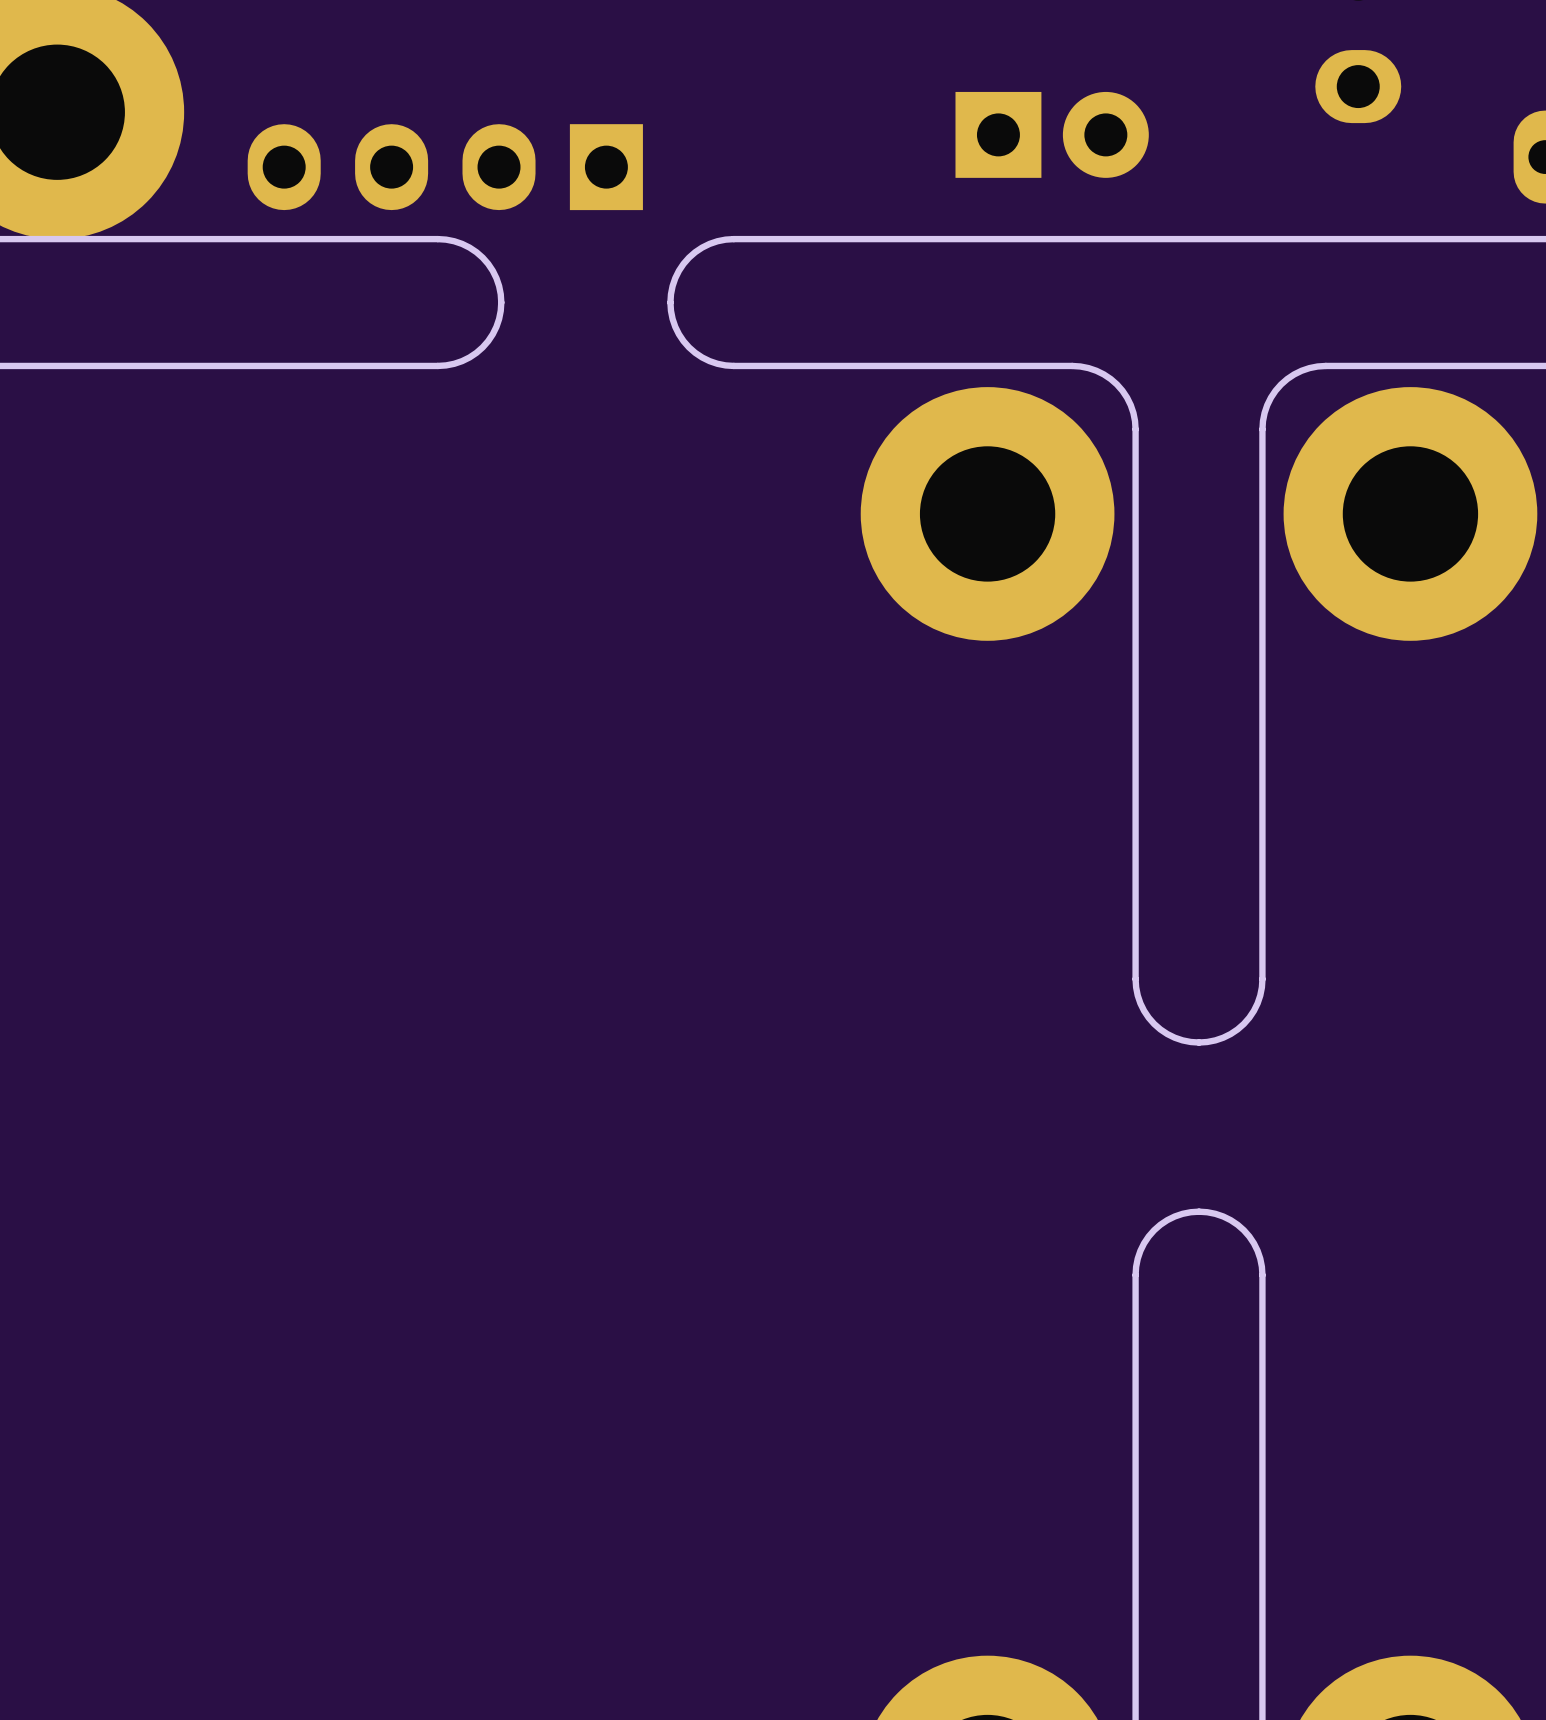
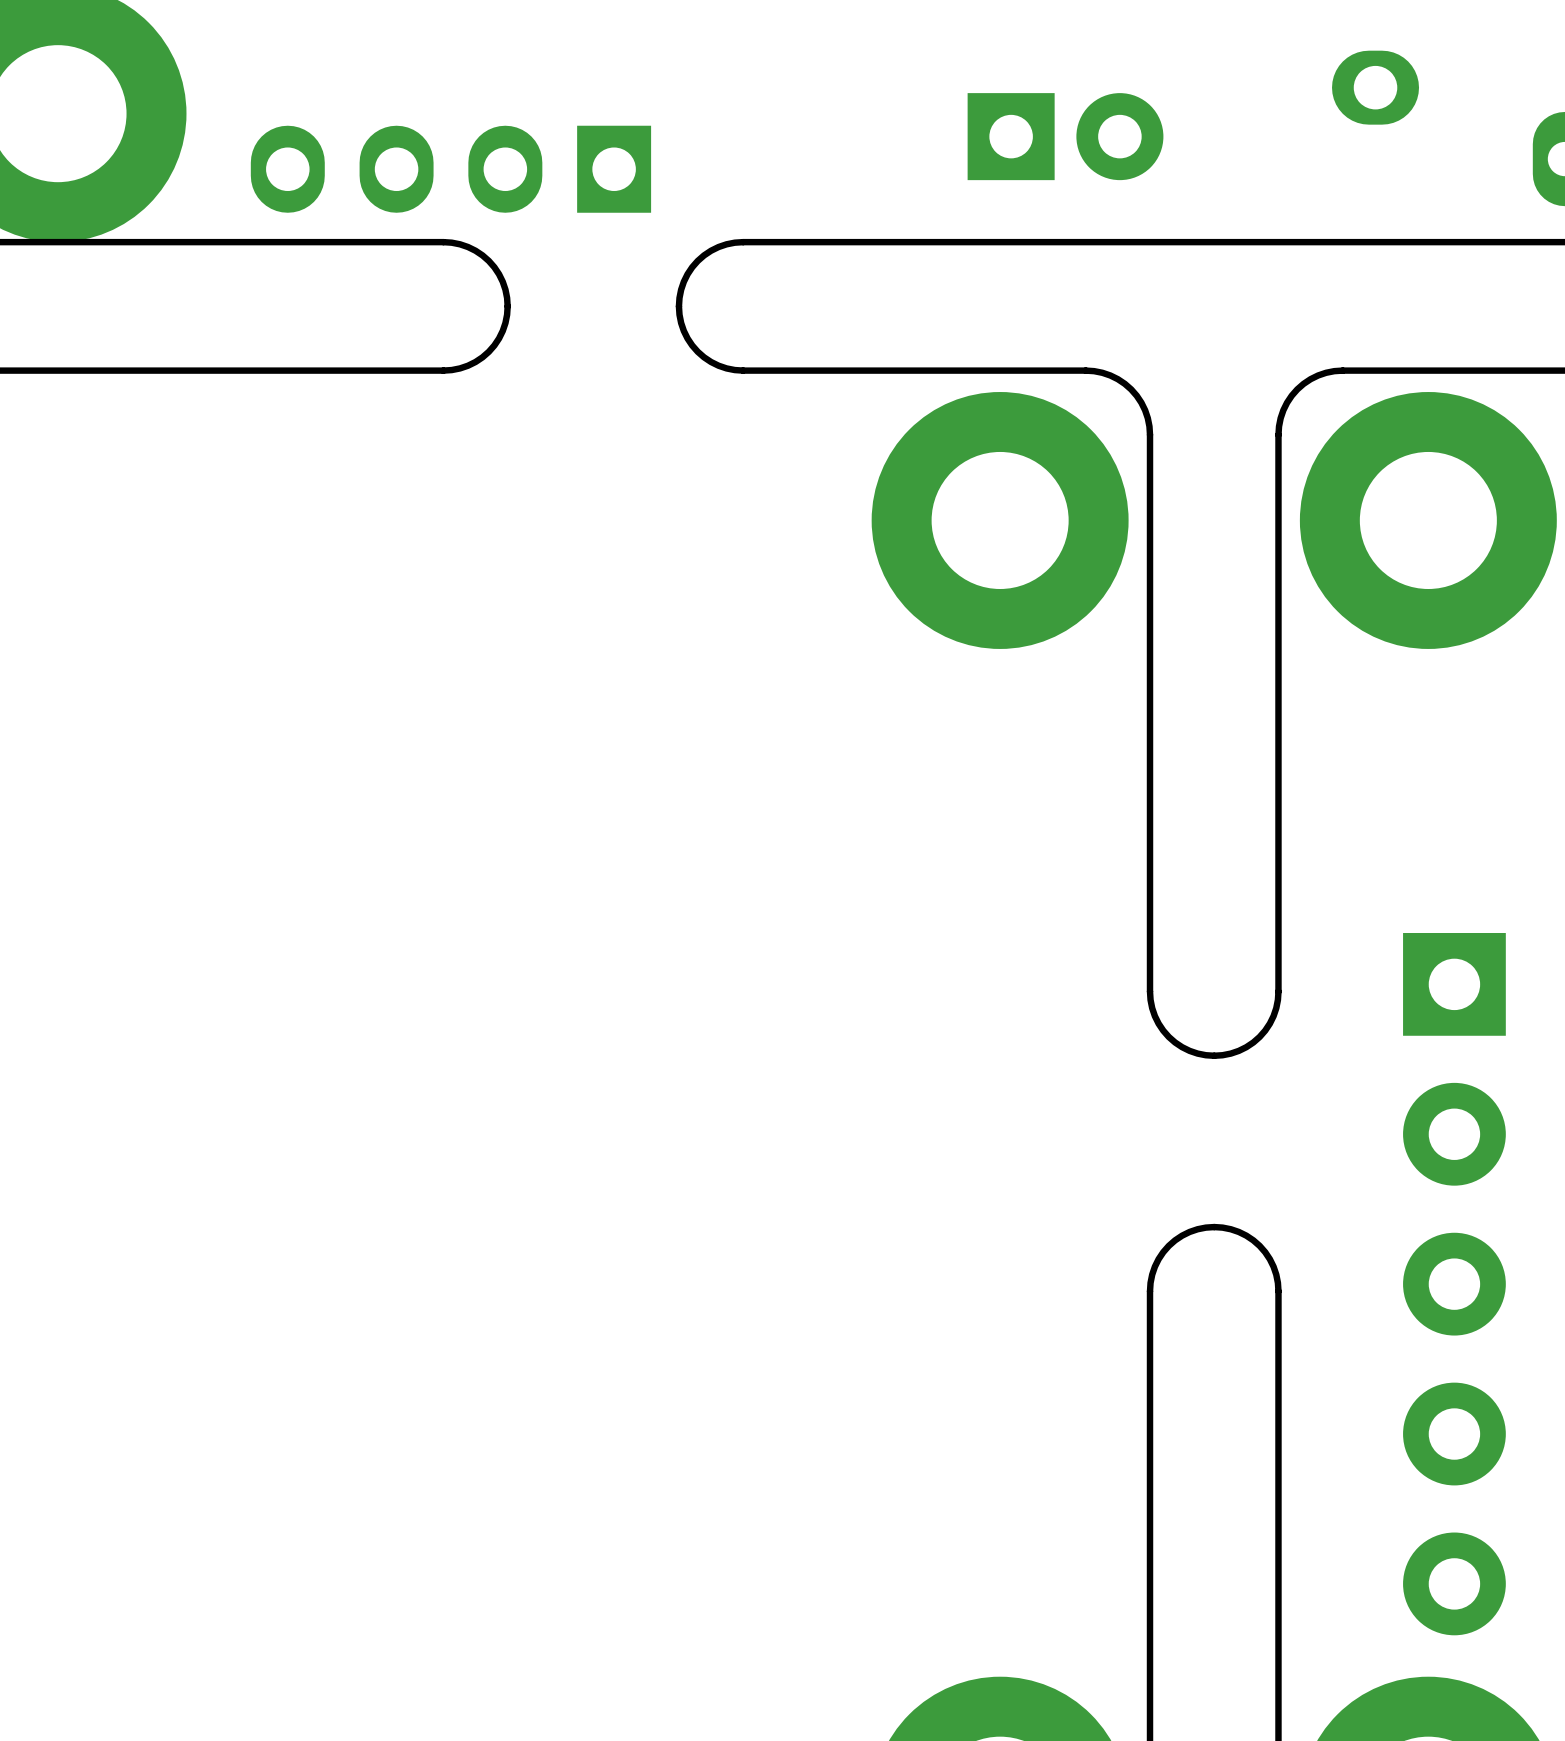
part: none -> (1454, 1284)

